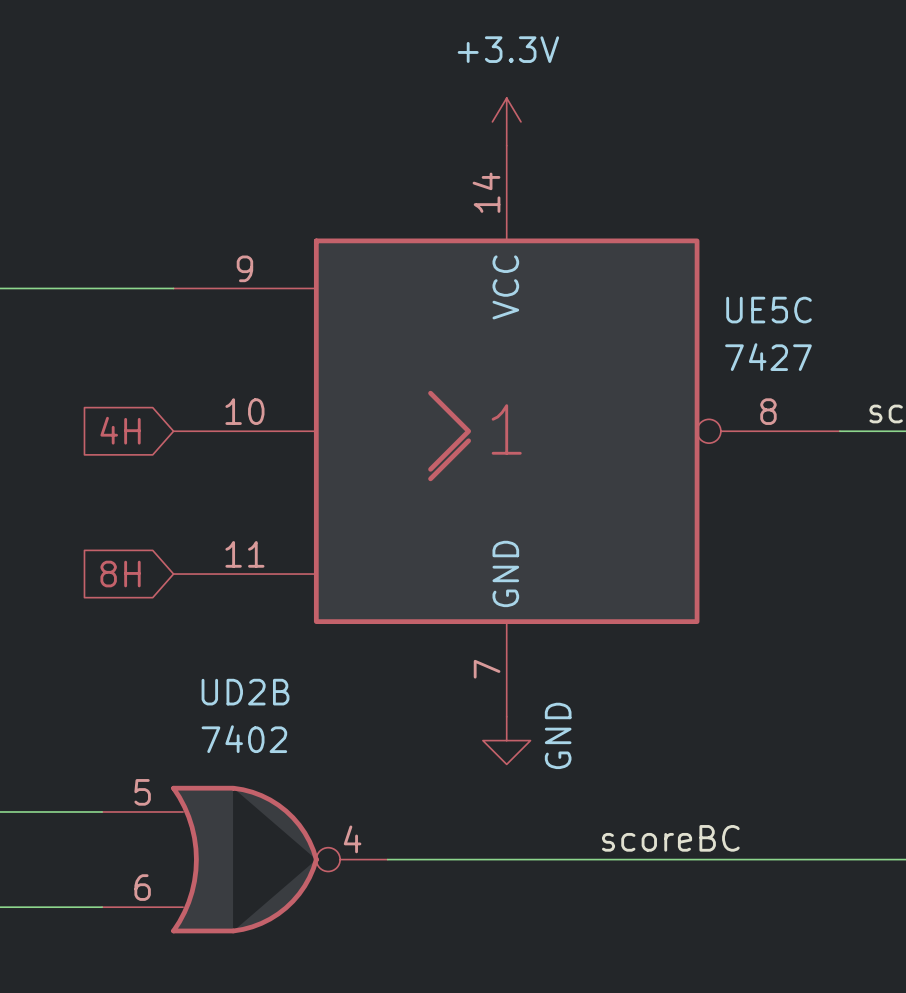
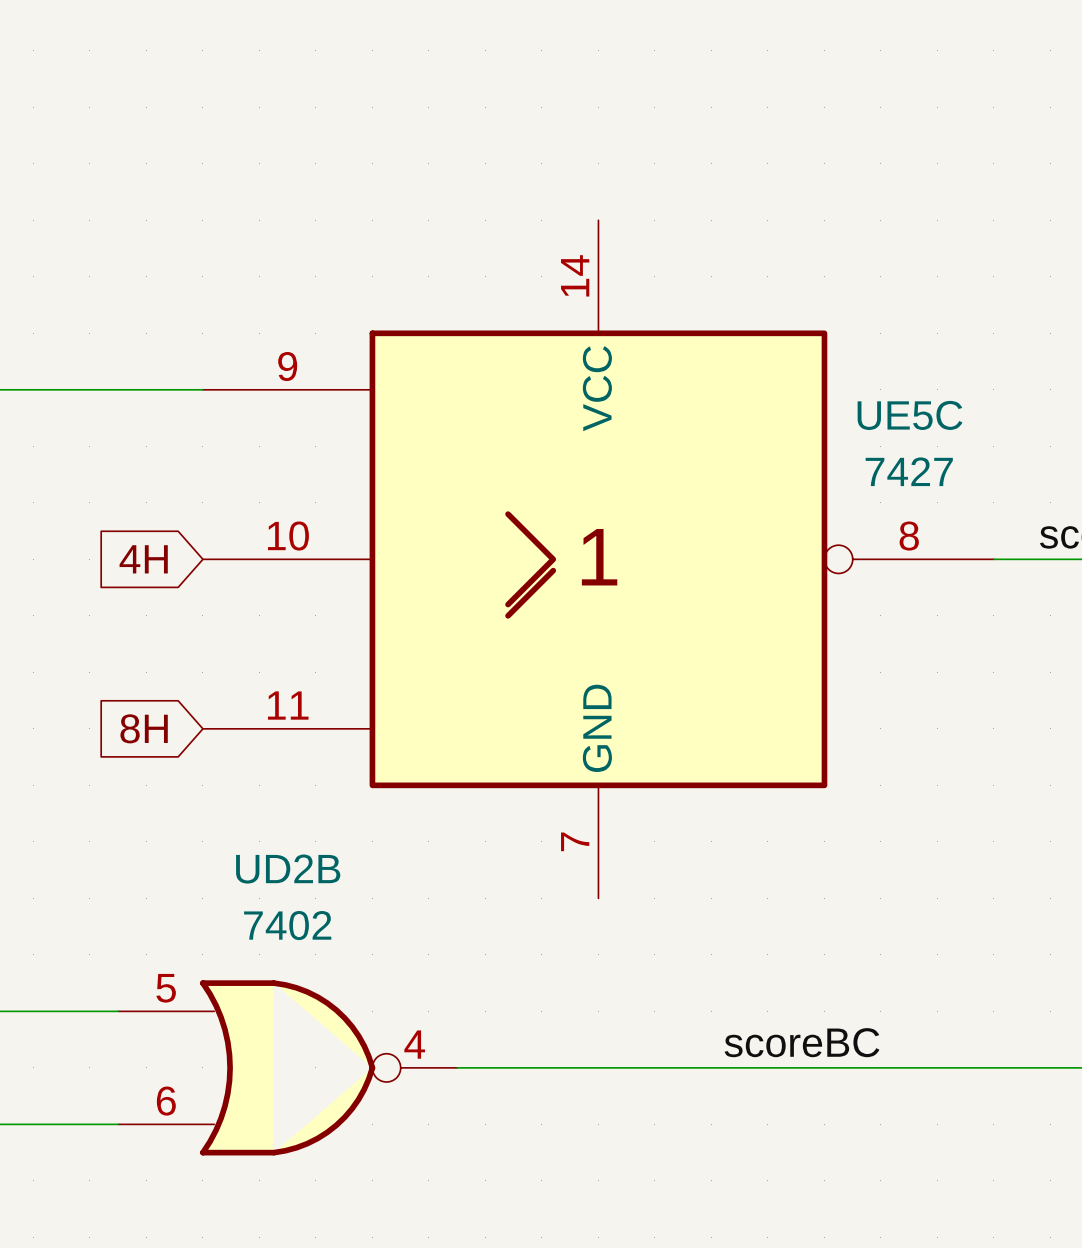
power symbol: +3.3V (506, 121) -> none
power symbol: GND (506, 740) -> none

